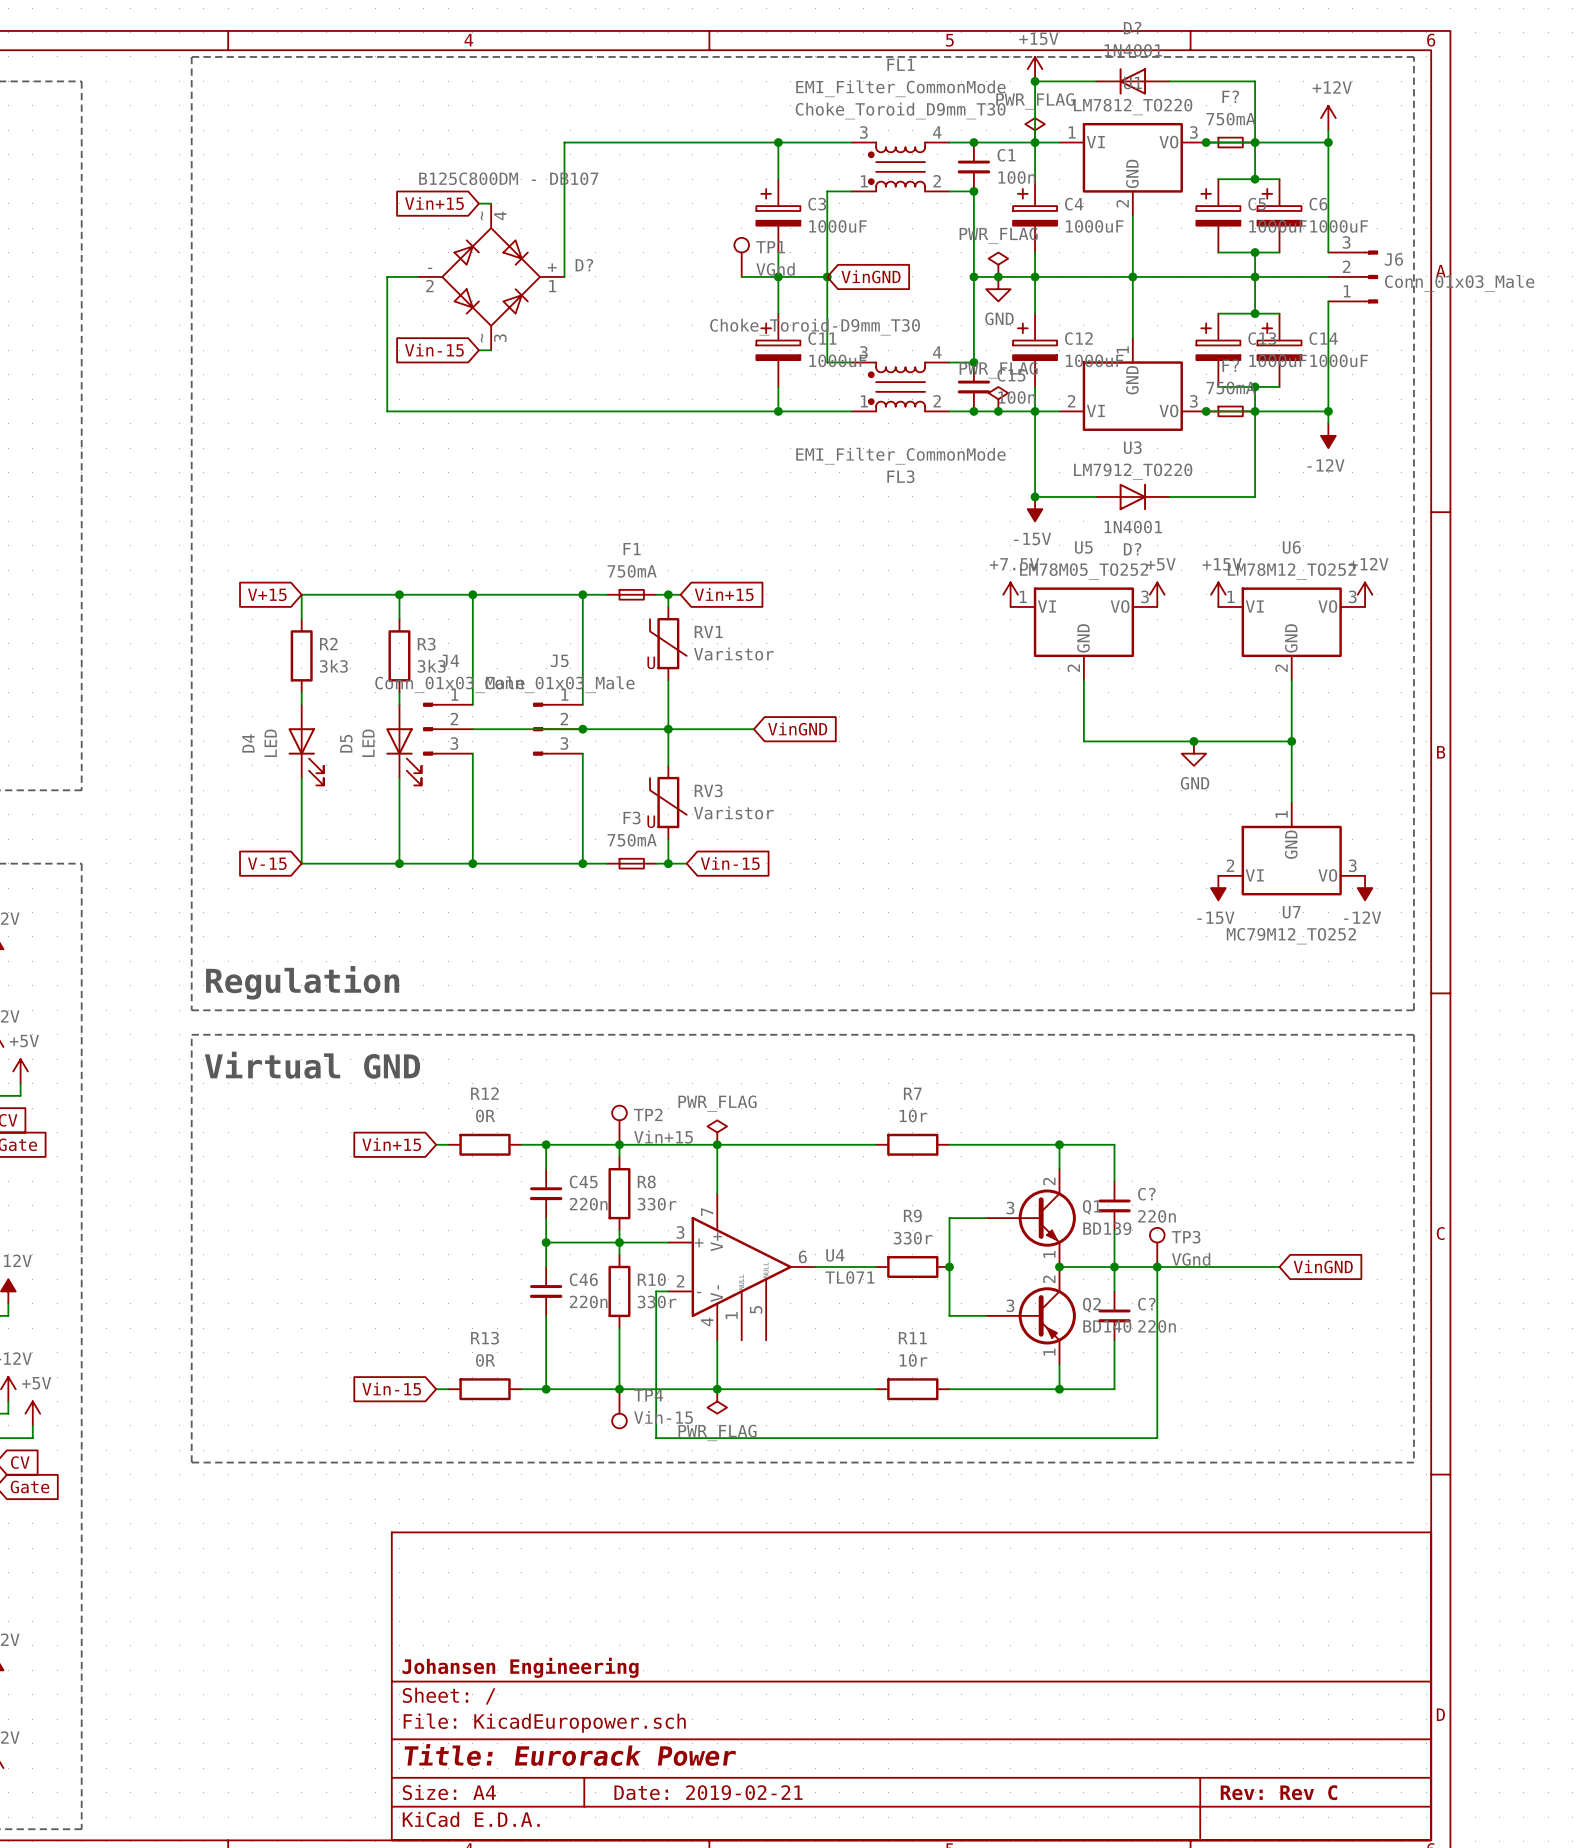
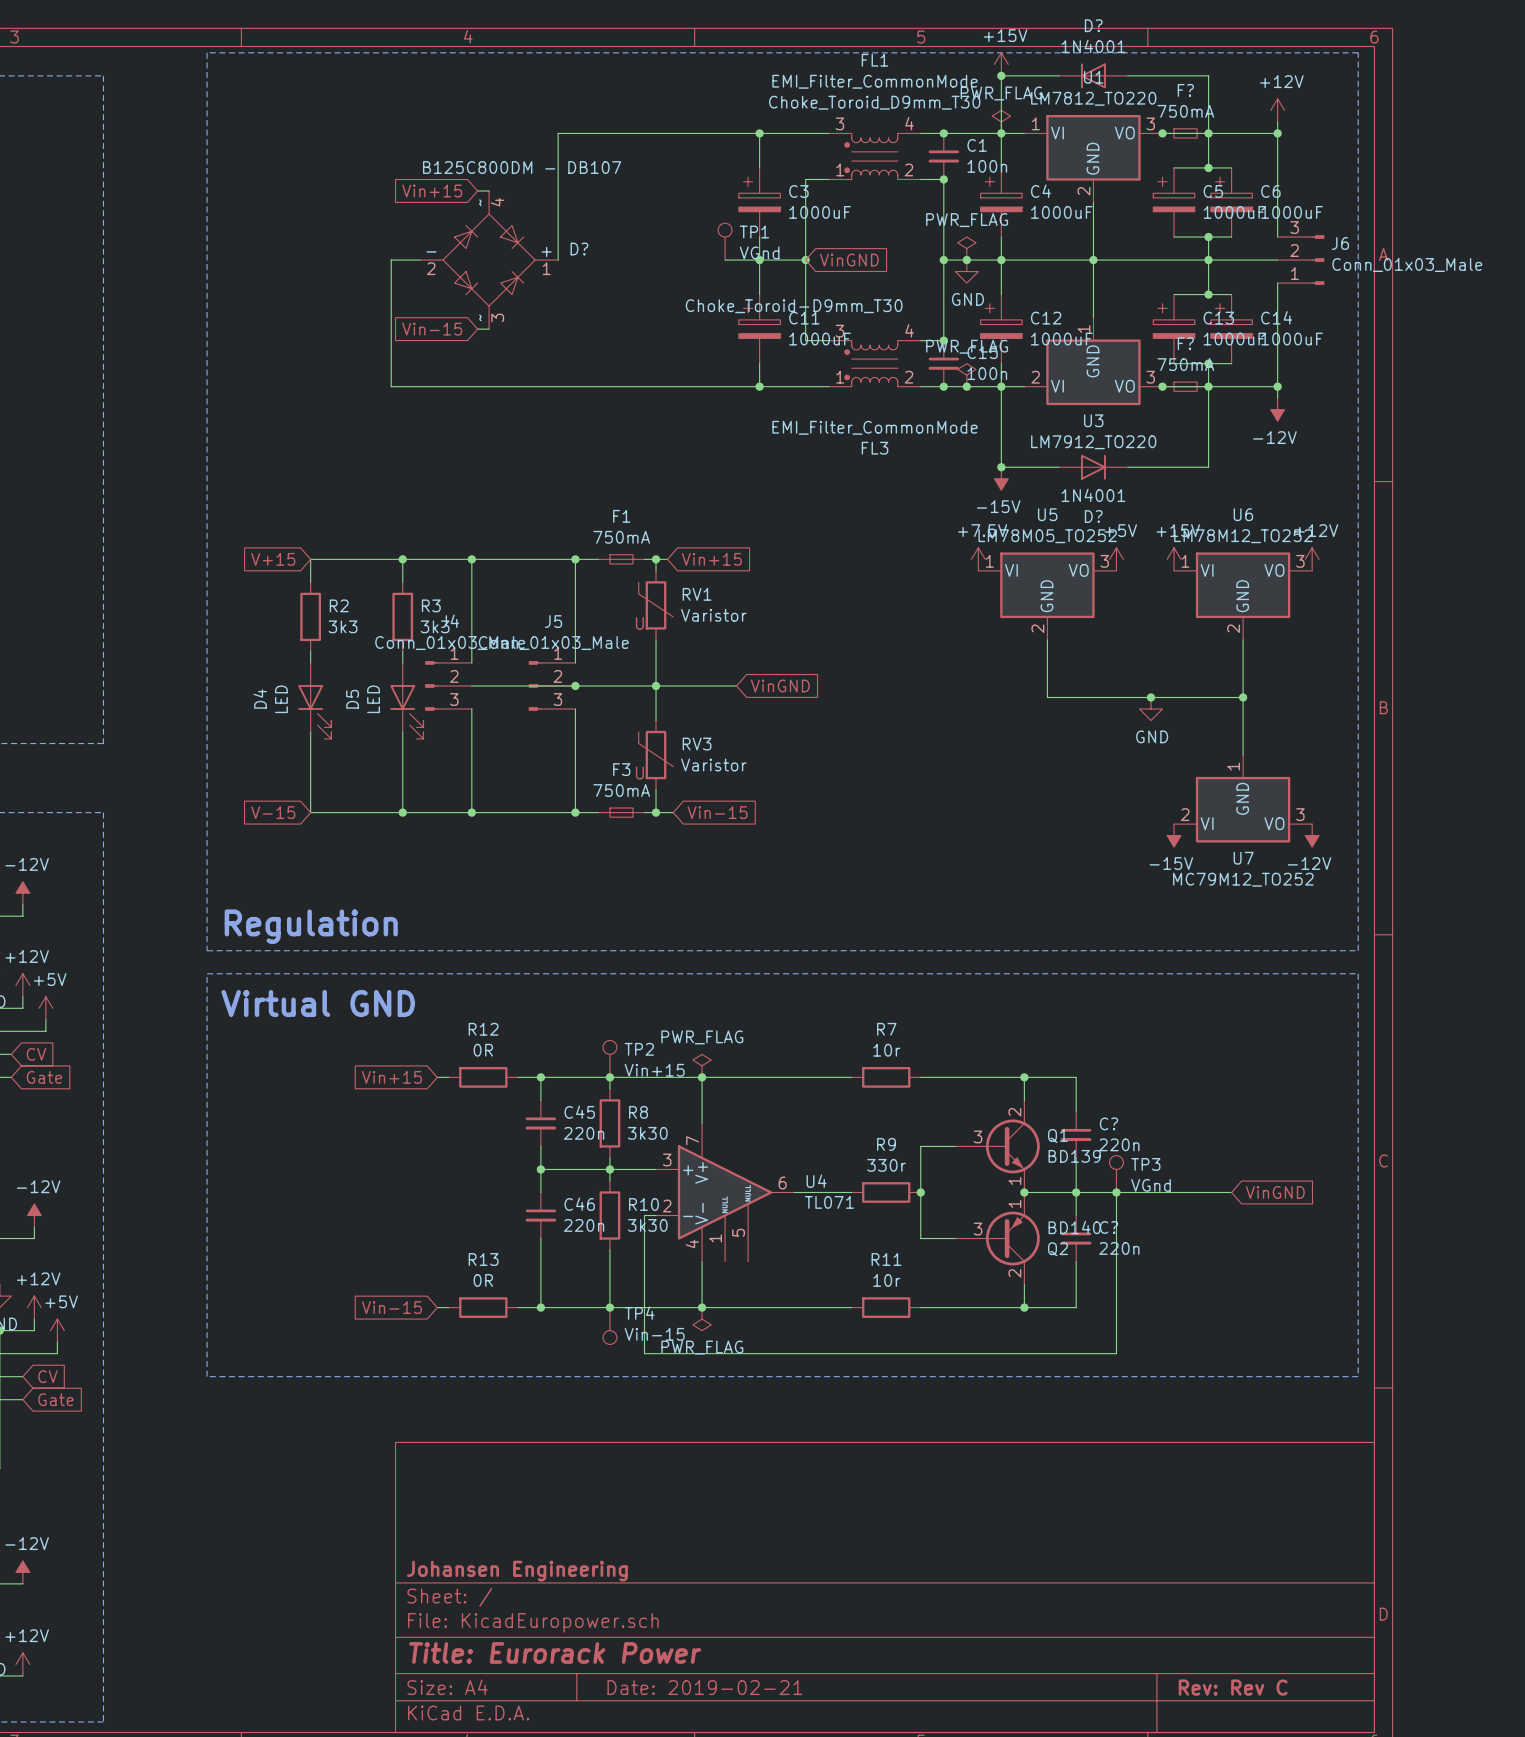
R8 value: 330r (657, 1204) -> 3k30 (647, 1133)
R10 value: 330r (657, 1301) -> 3k30 (647, 1225)
Q2 flip: as is (1047, 1315) -> up-down (1012, 1238)

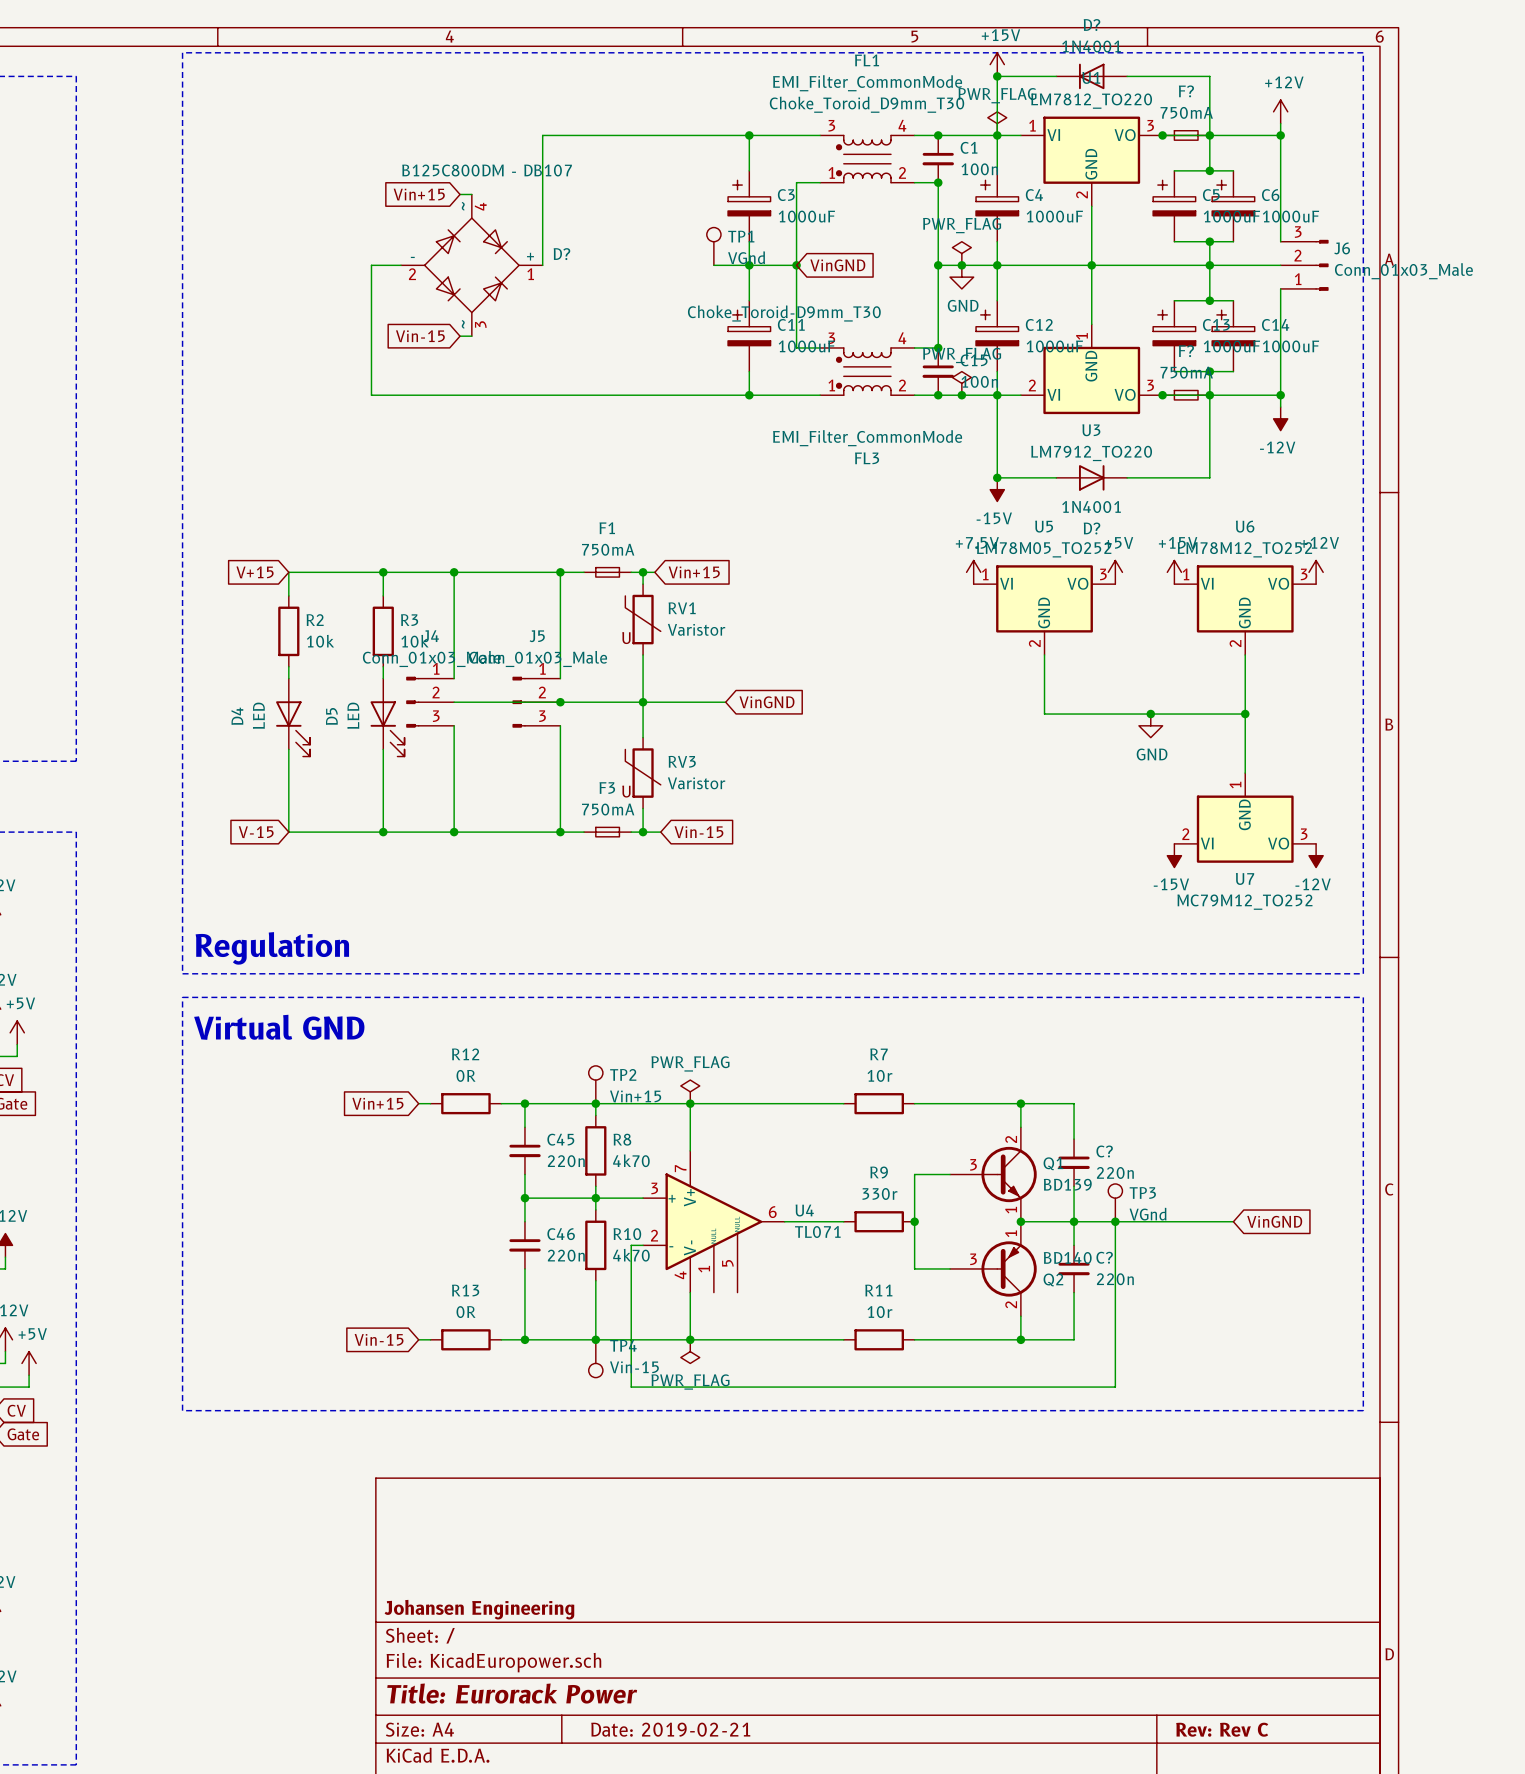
R2 value: 3k3 (343, 626) -> 10k (320, 641)
R3 value: 3k3 (435, 626) -> 10k (414, 641)
R8 value: 3k30 (647, 1133) -> 4k70 (631, 1160)
R10 value: 3k30 (647, 1225) -> 4k70 (631, 1255)

